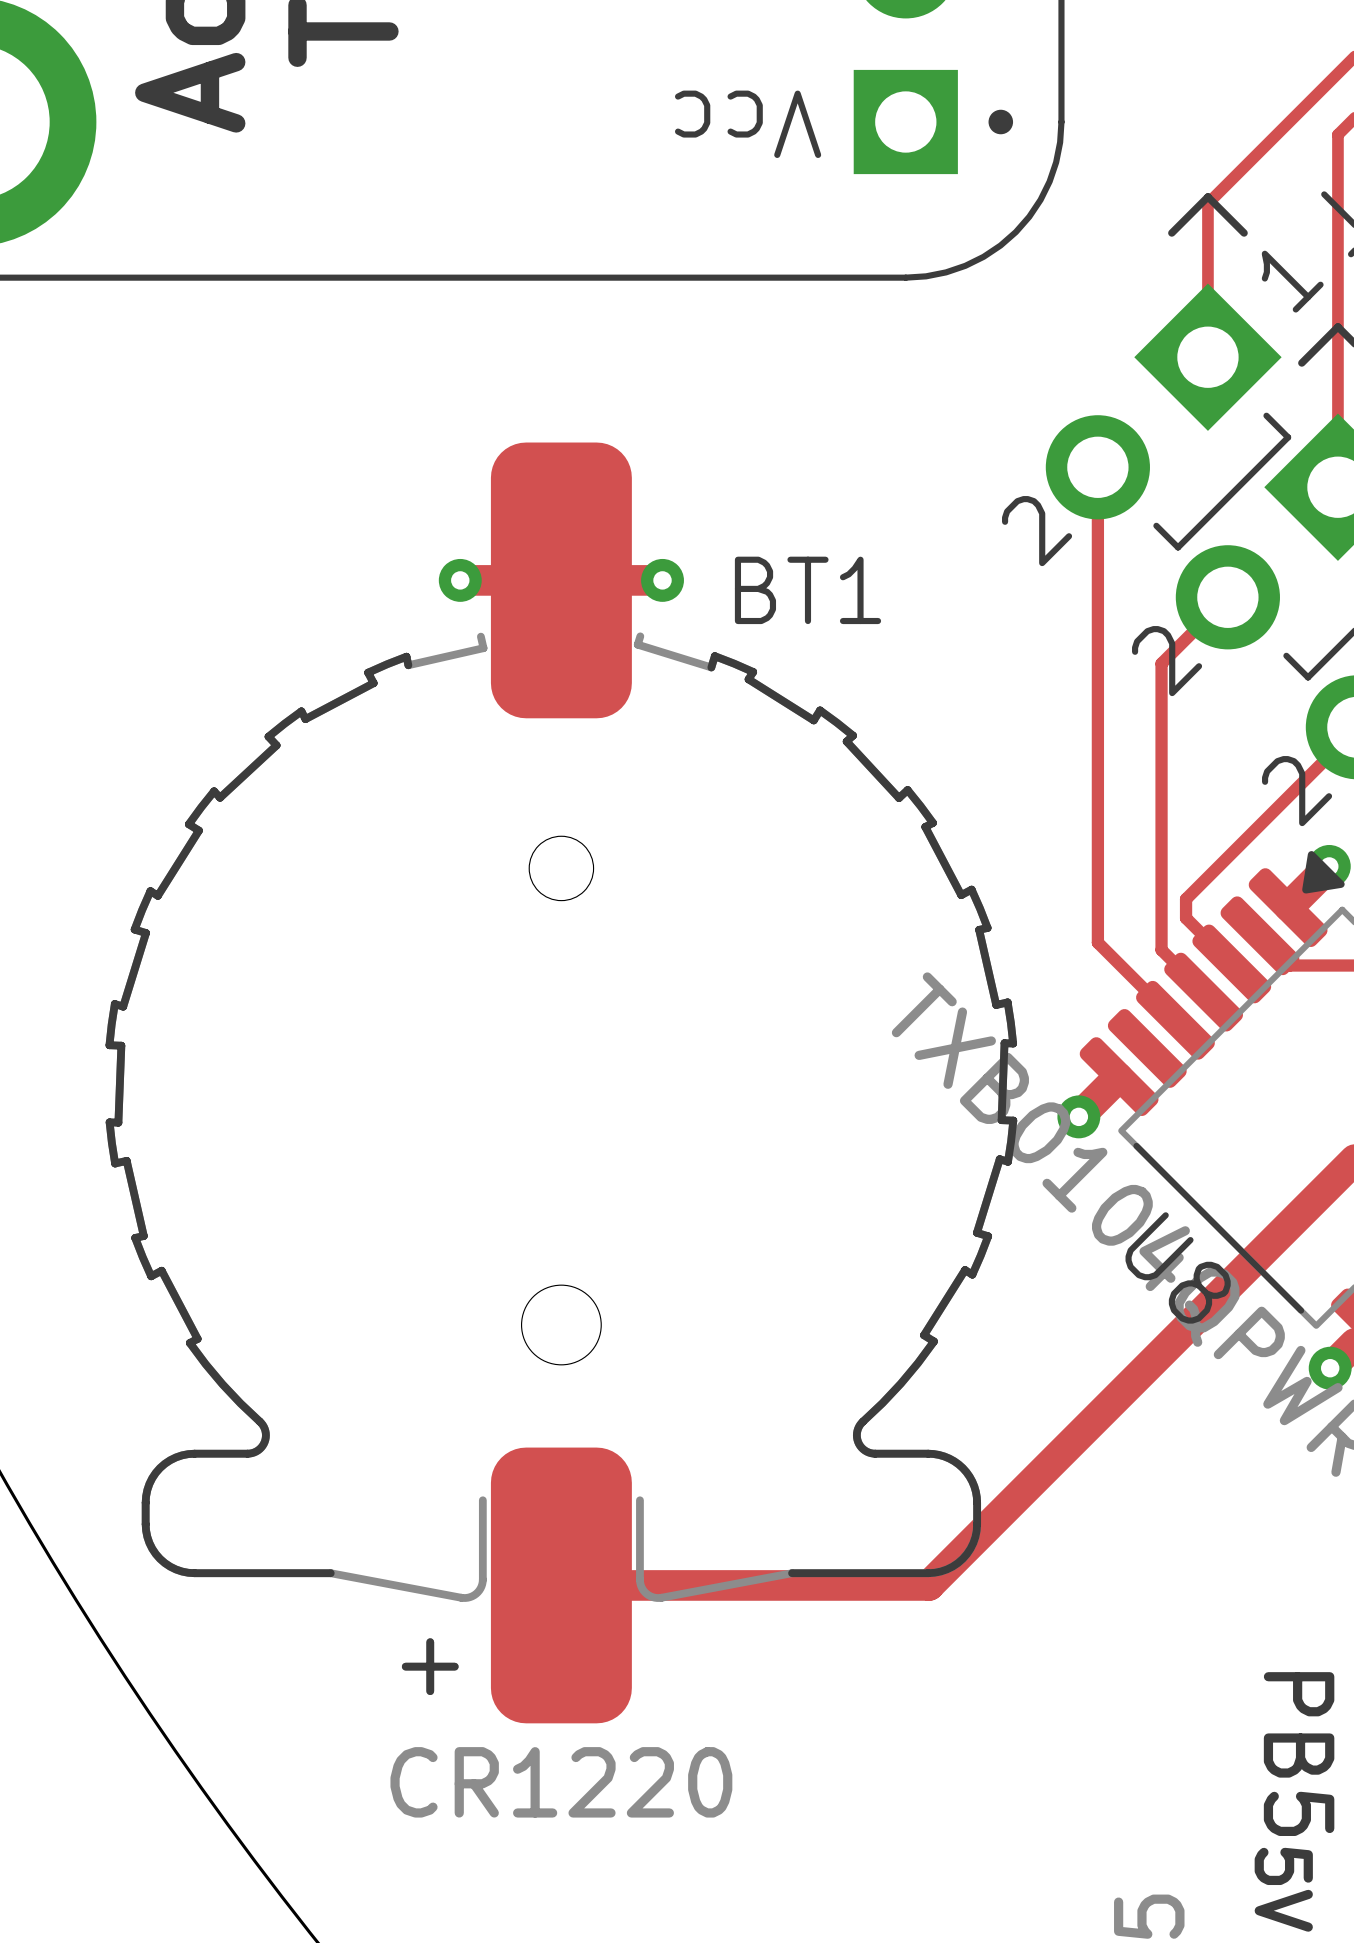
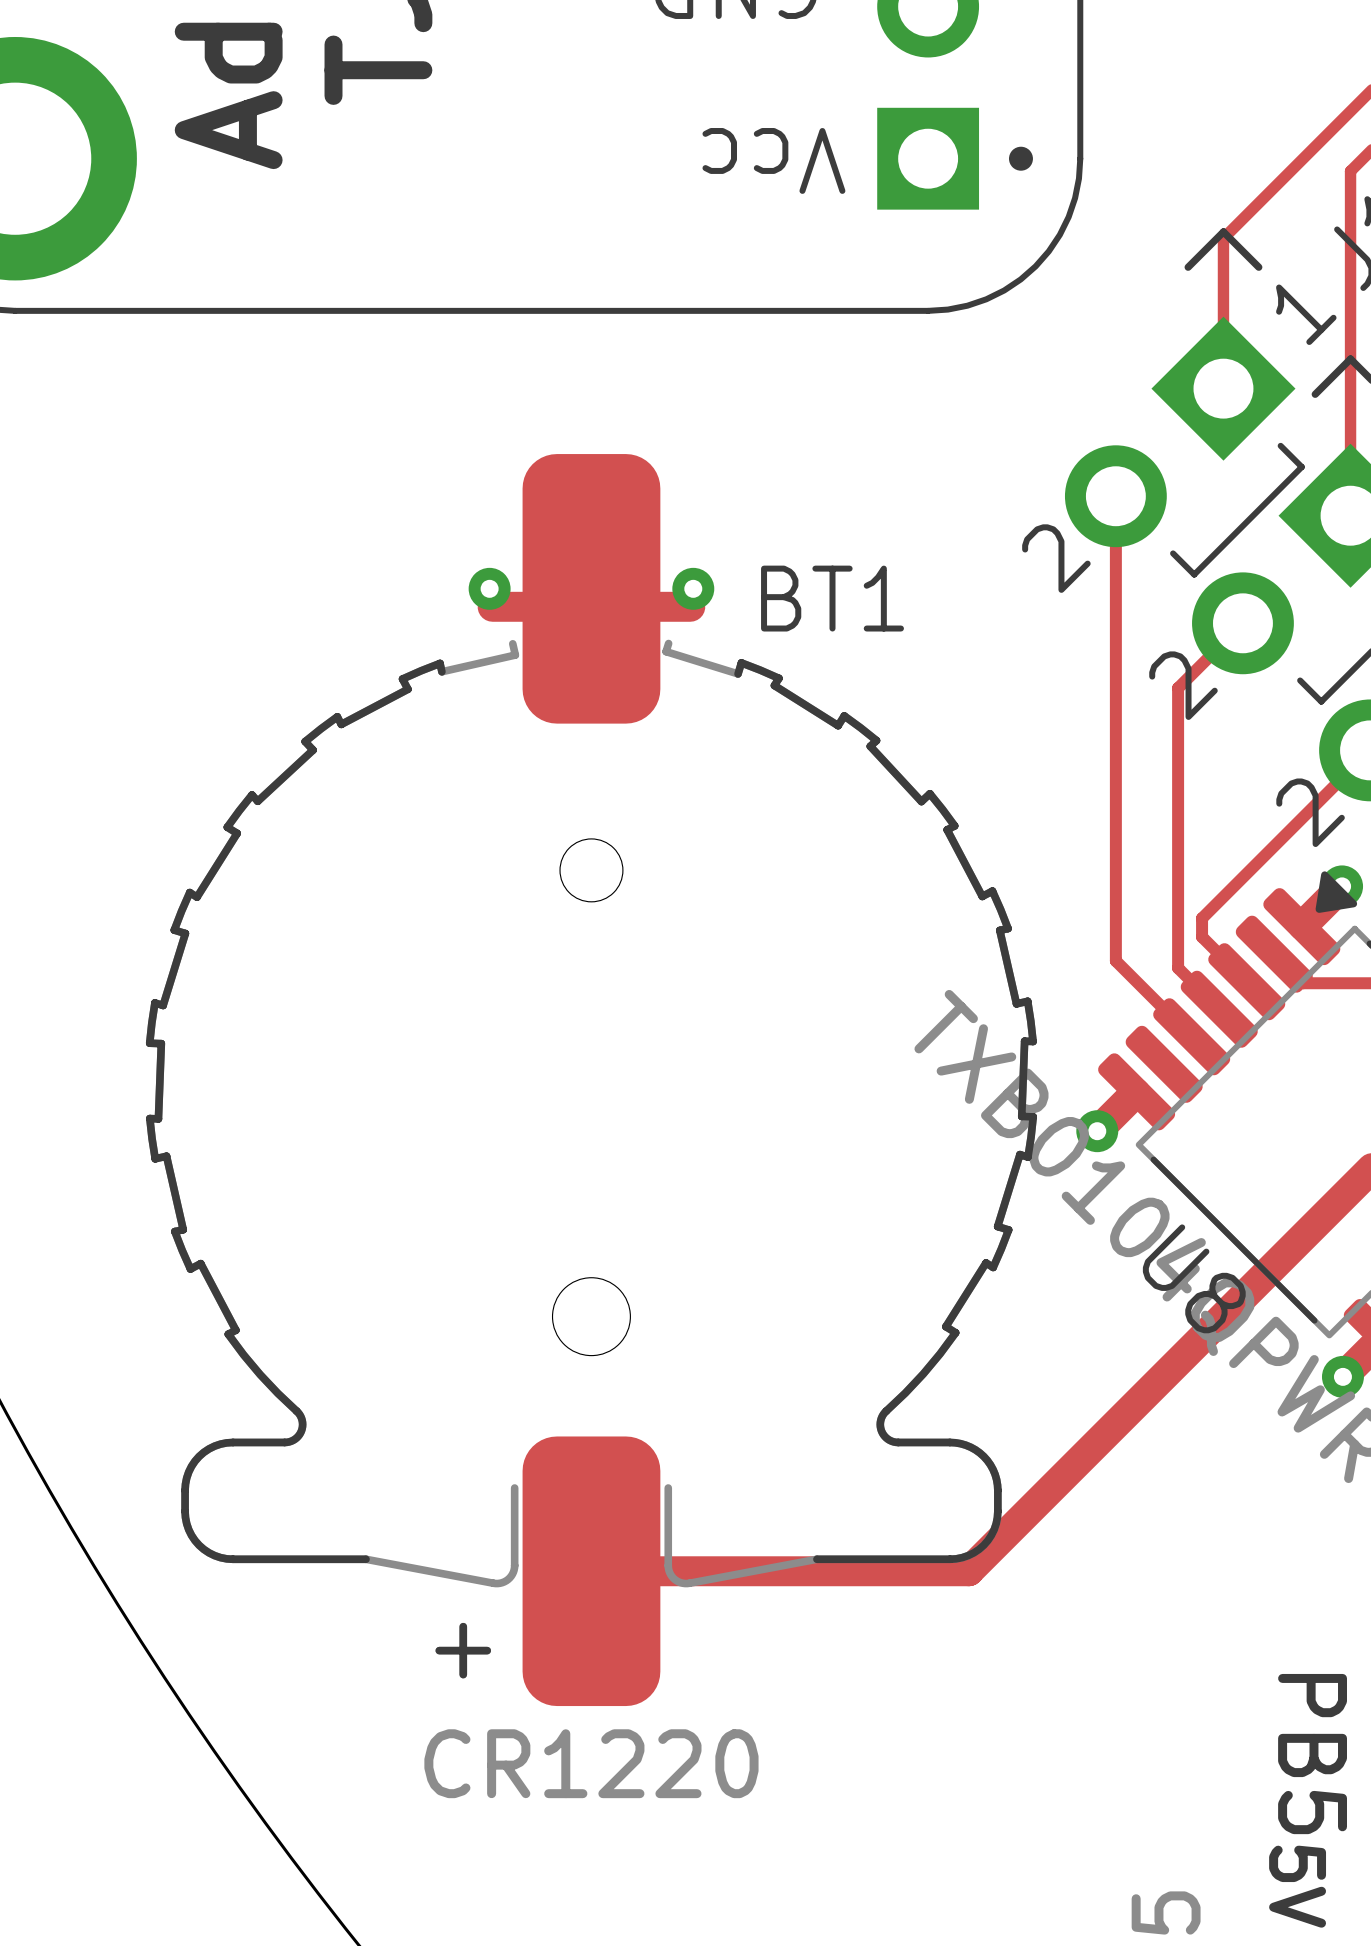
via position: (460, 580) -> (489, 588)
via position: (662, 580) -> (693, 588)
BT1 position: (561, 1082) -> (591, 1080)
top track: (947, 1567) (929, 1585) (561, 1585) -> (968, 1571) (591, 1571)

